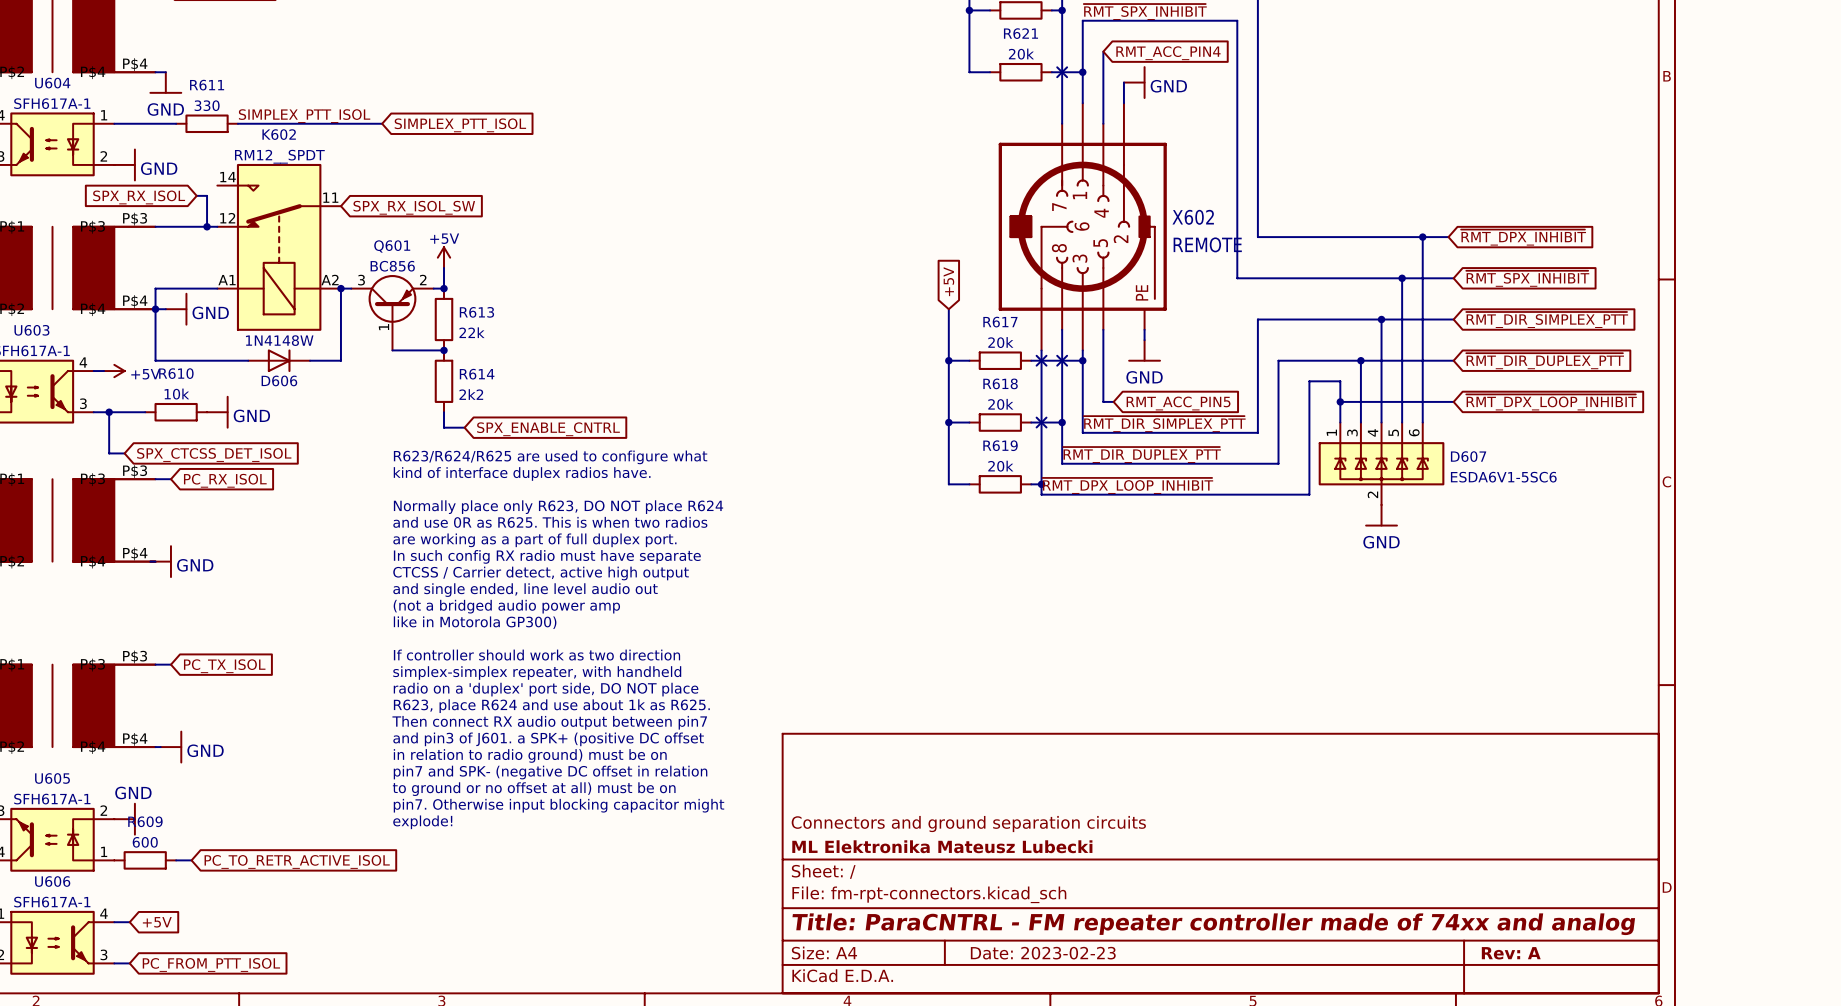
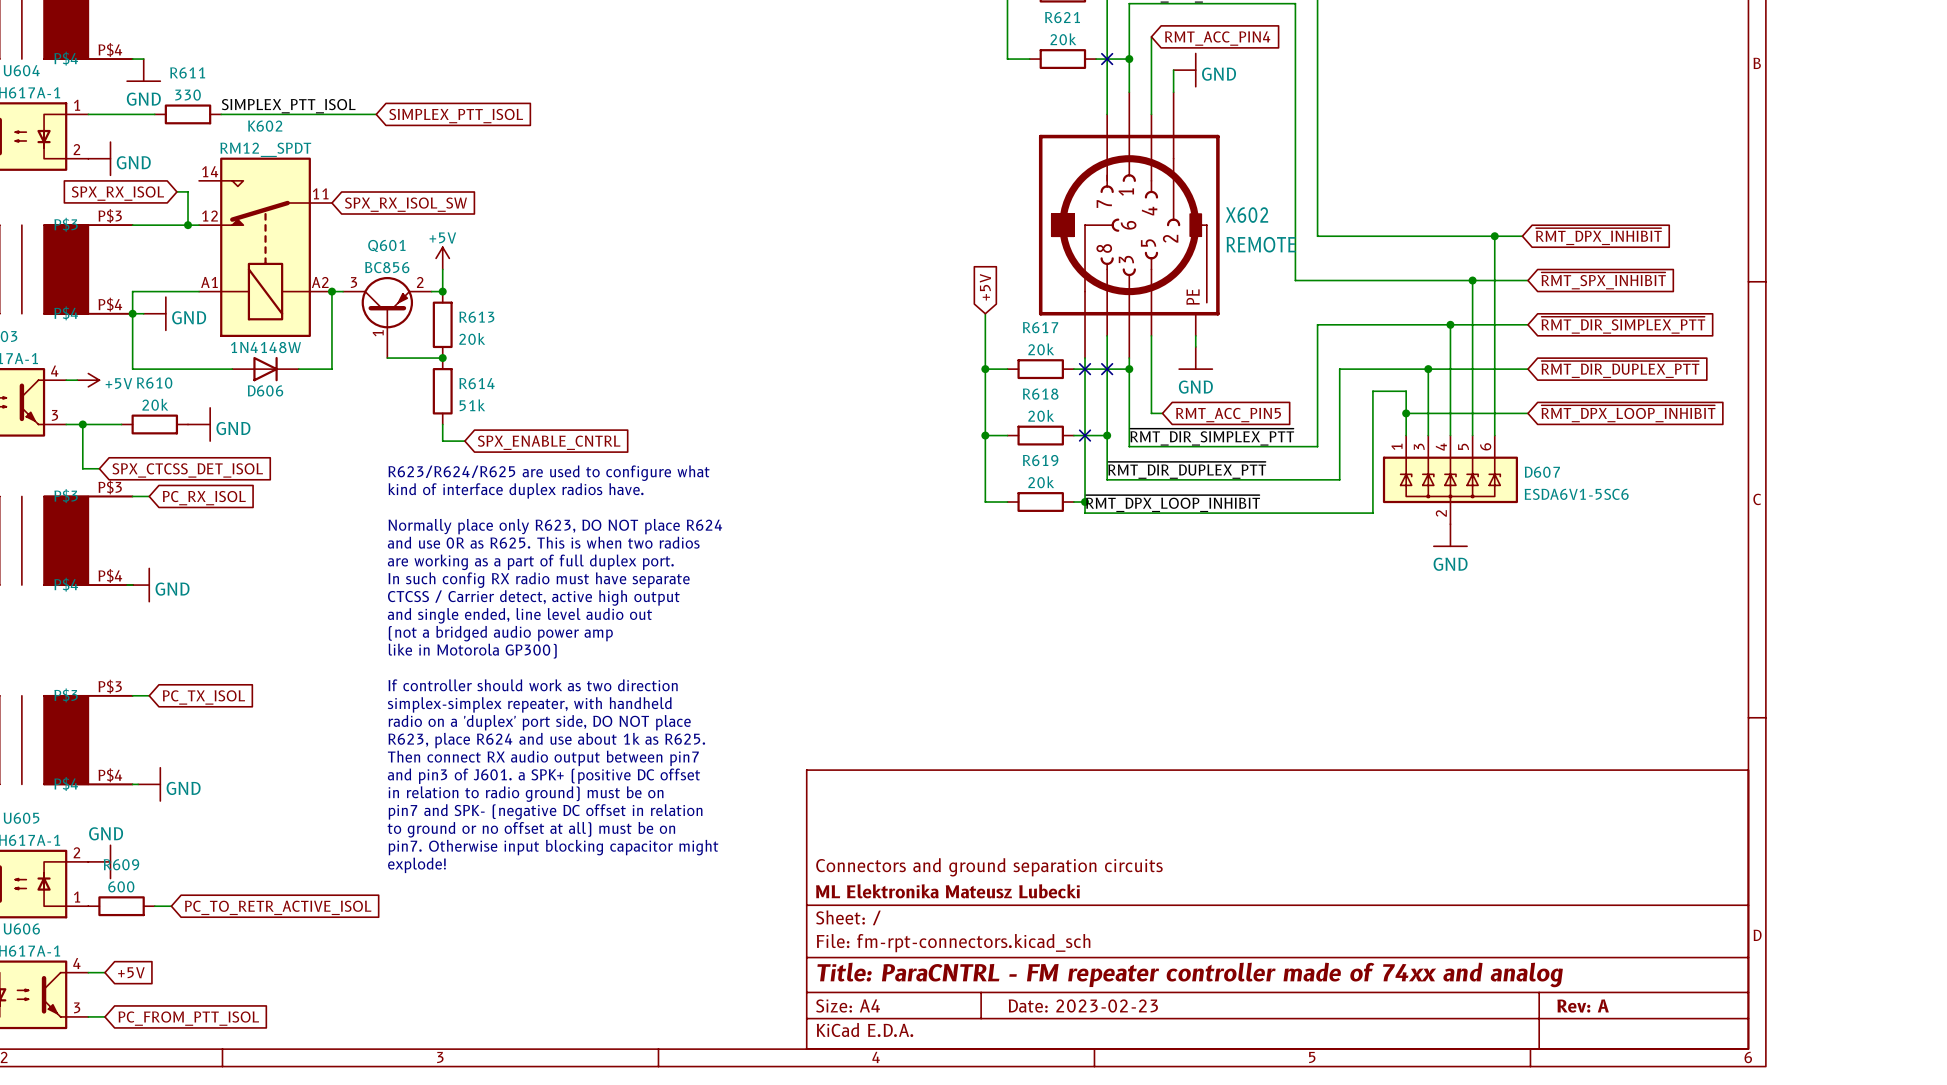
R613 value: 22k (472, 332) -> 20k (472, 338)
R610 value: 10k (176, 394) -> 20k (155, 404)
R614 value: 2k2 (471, 394) -> 51k (472, 405)

